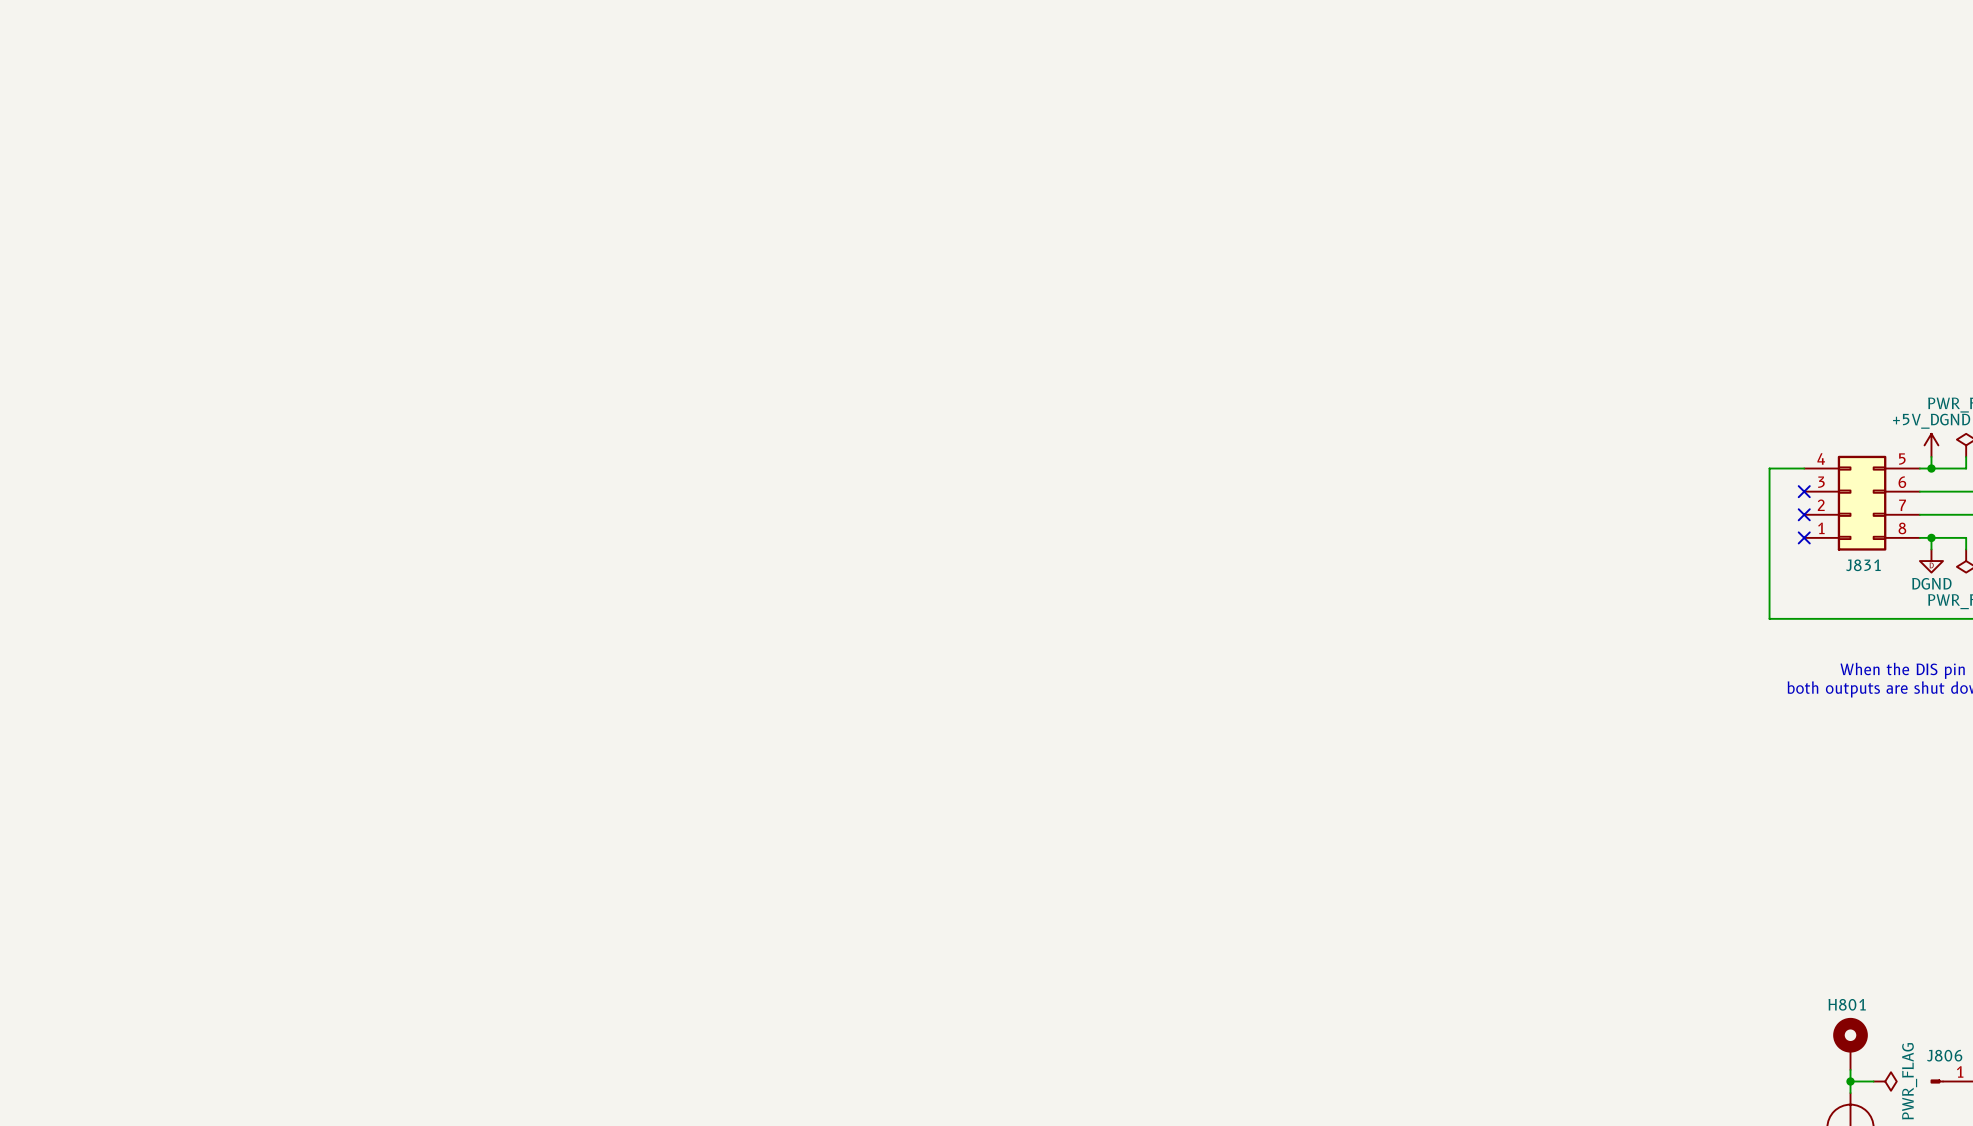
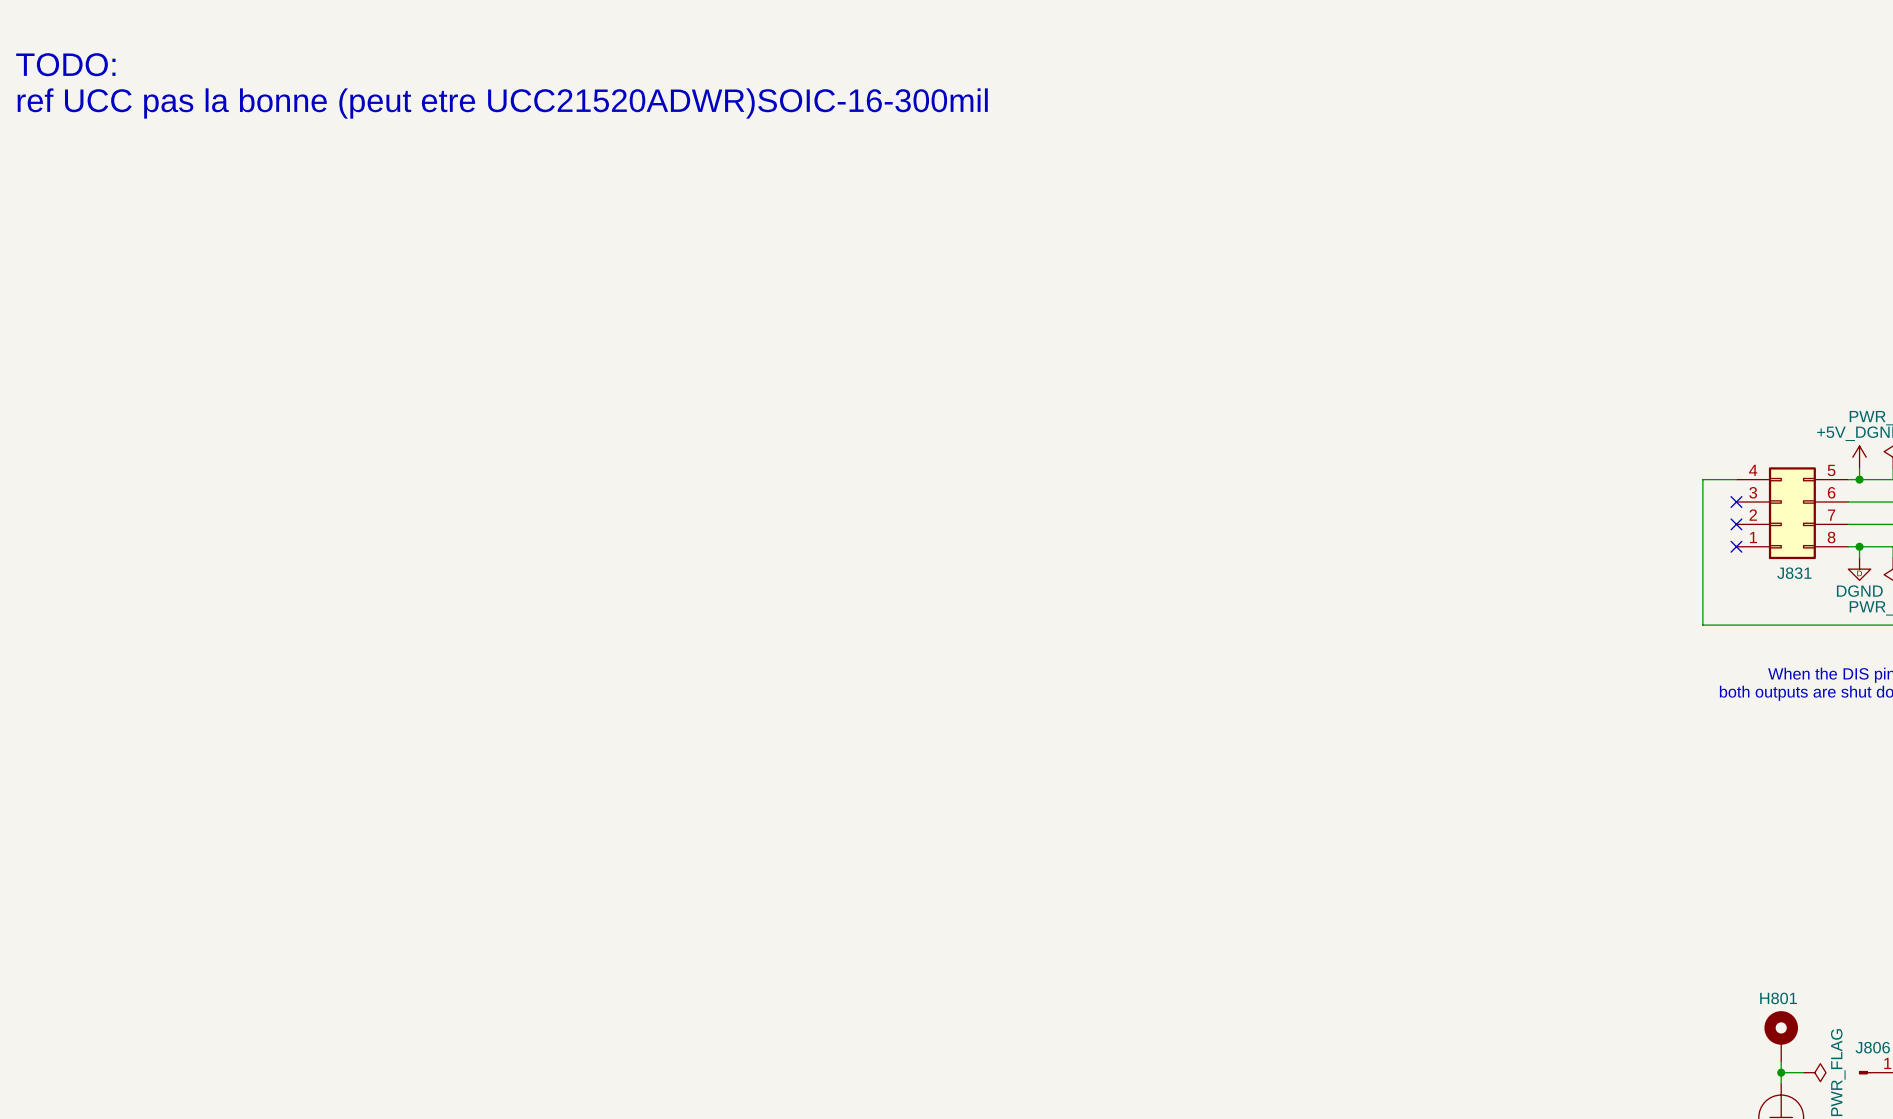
text: none -> TODO: (65, 64)
text: none -> ref UCC pas la bonne (peut etre UCC21520ADWR)SOIC-16-300mil (502, 103)

